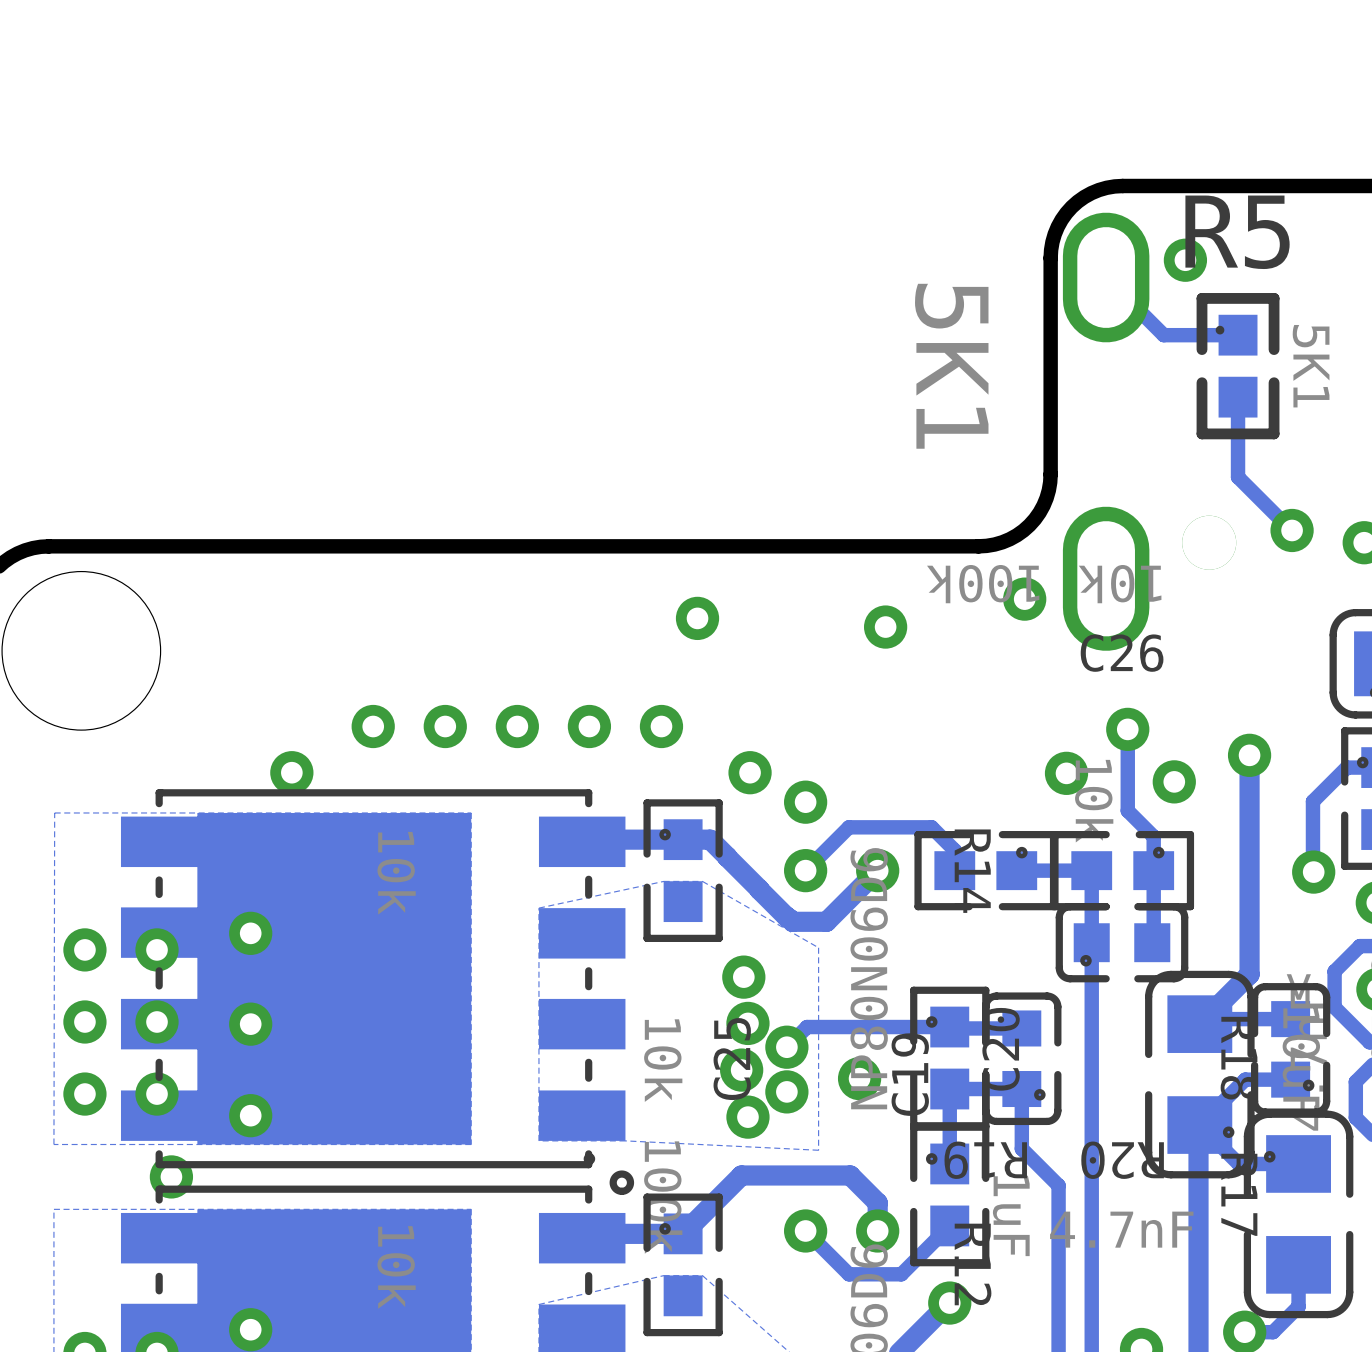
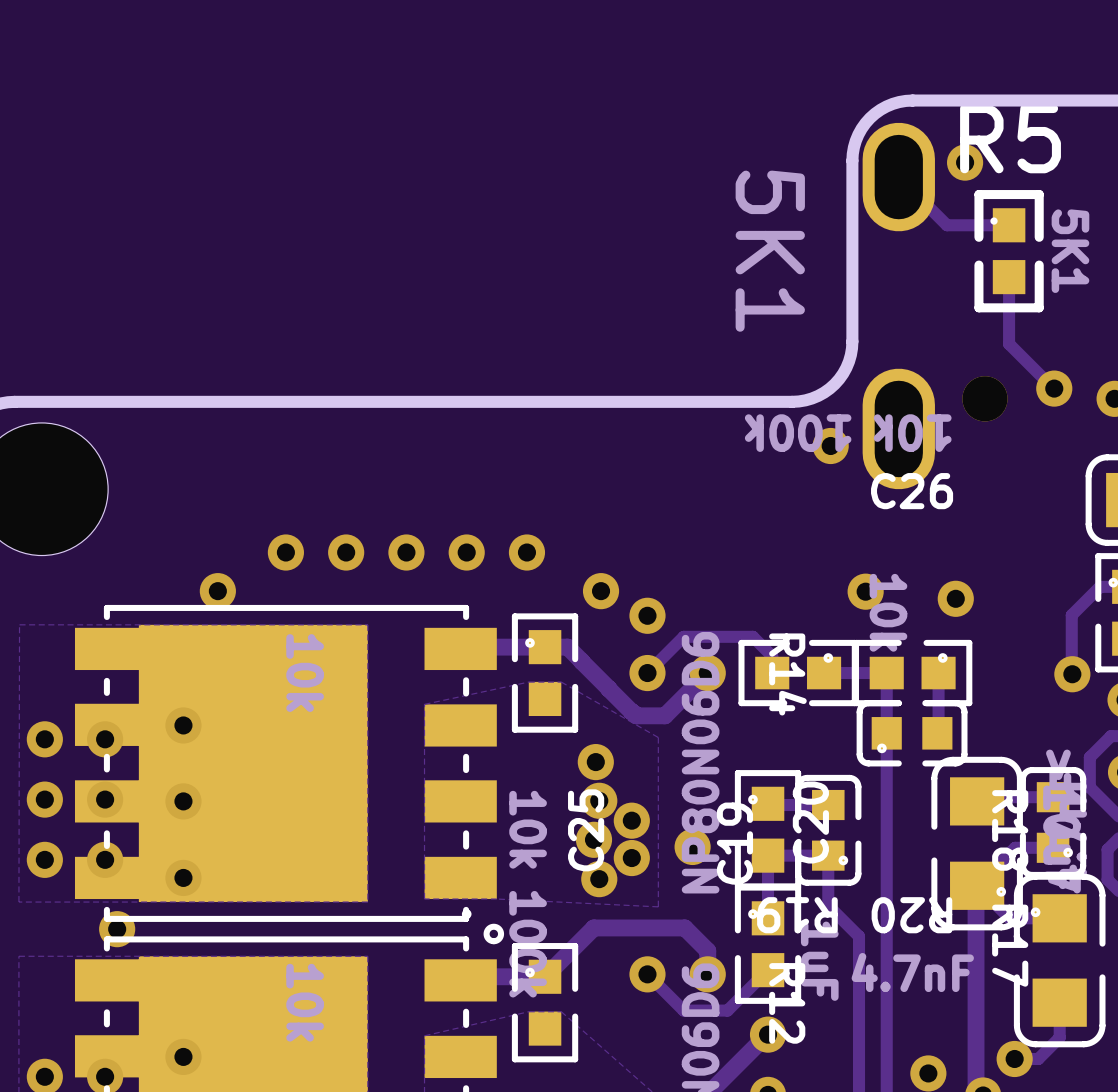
via: (697, 618) -> none
via: (885, 627) -> none
track: (1127, 729) (1127, 810) (1153, 836) (1153, 870) -> none
via: (1127, 729) -> none
track: (1249, 755) (1249, 974) (1199, 1024) -> none
via: (1249, 755) -> none
track: (949, 1027) (807, 1027) (786, 1047) -> none

